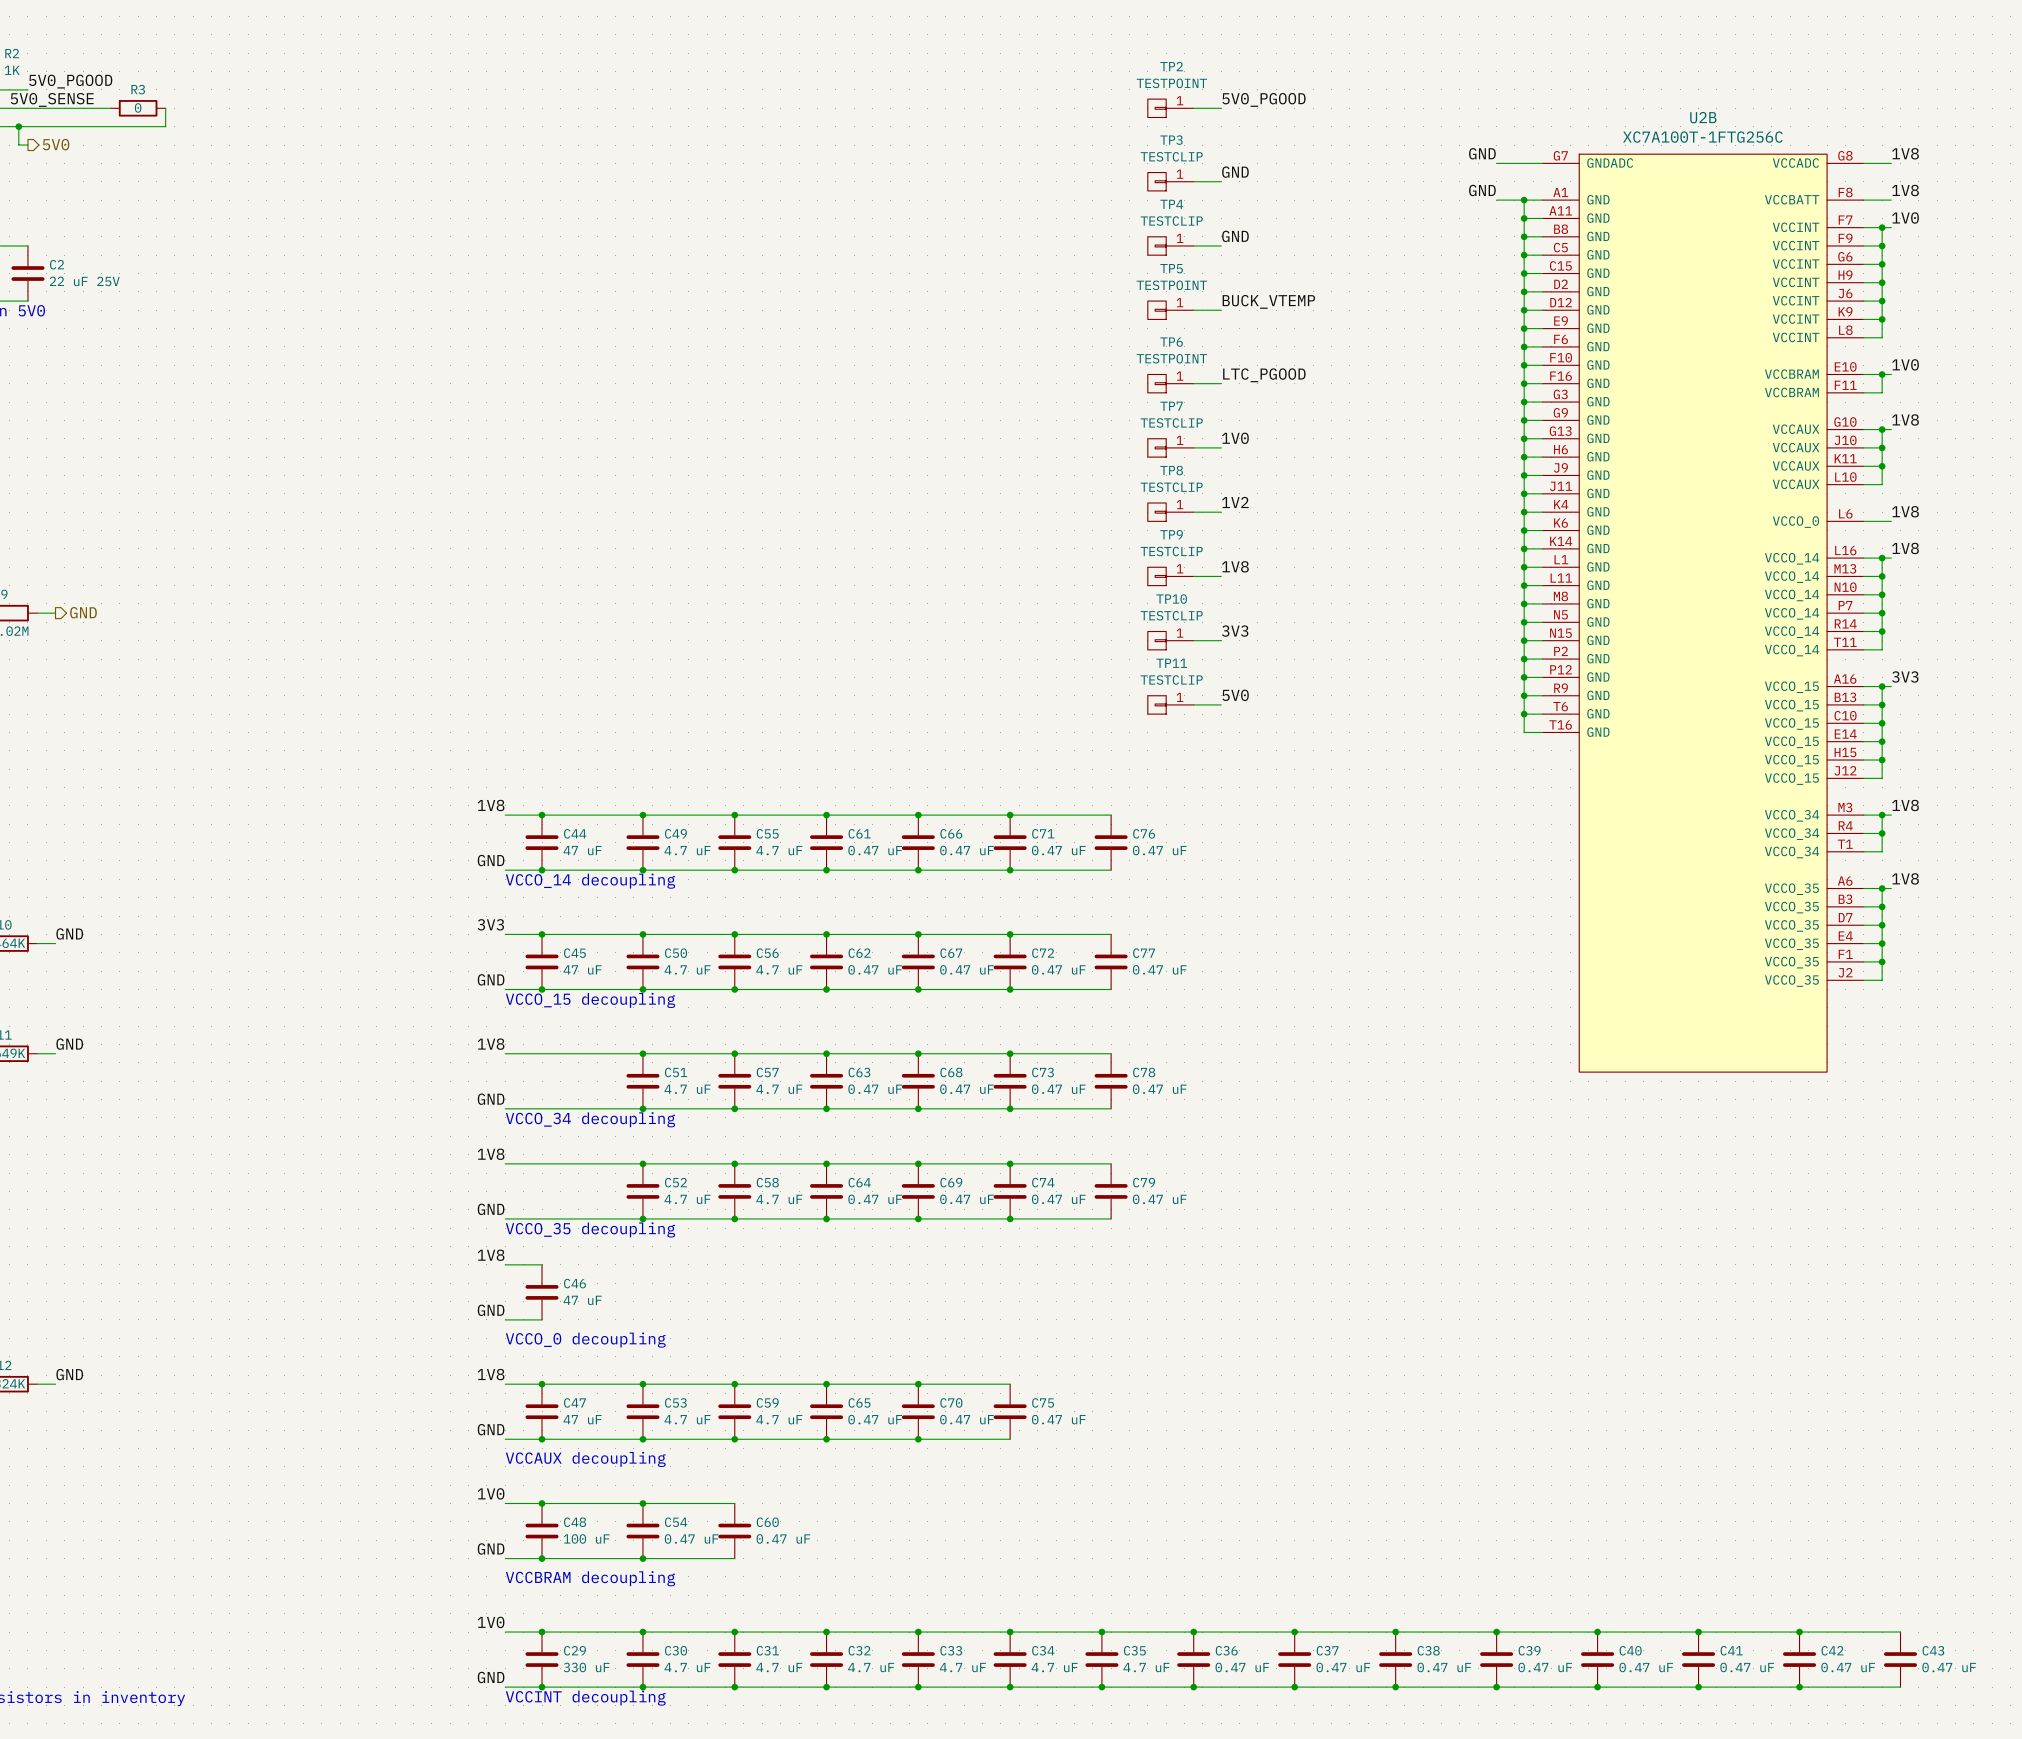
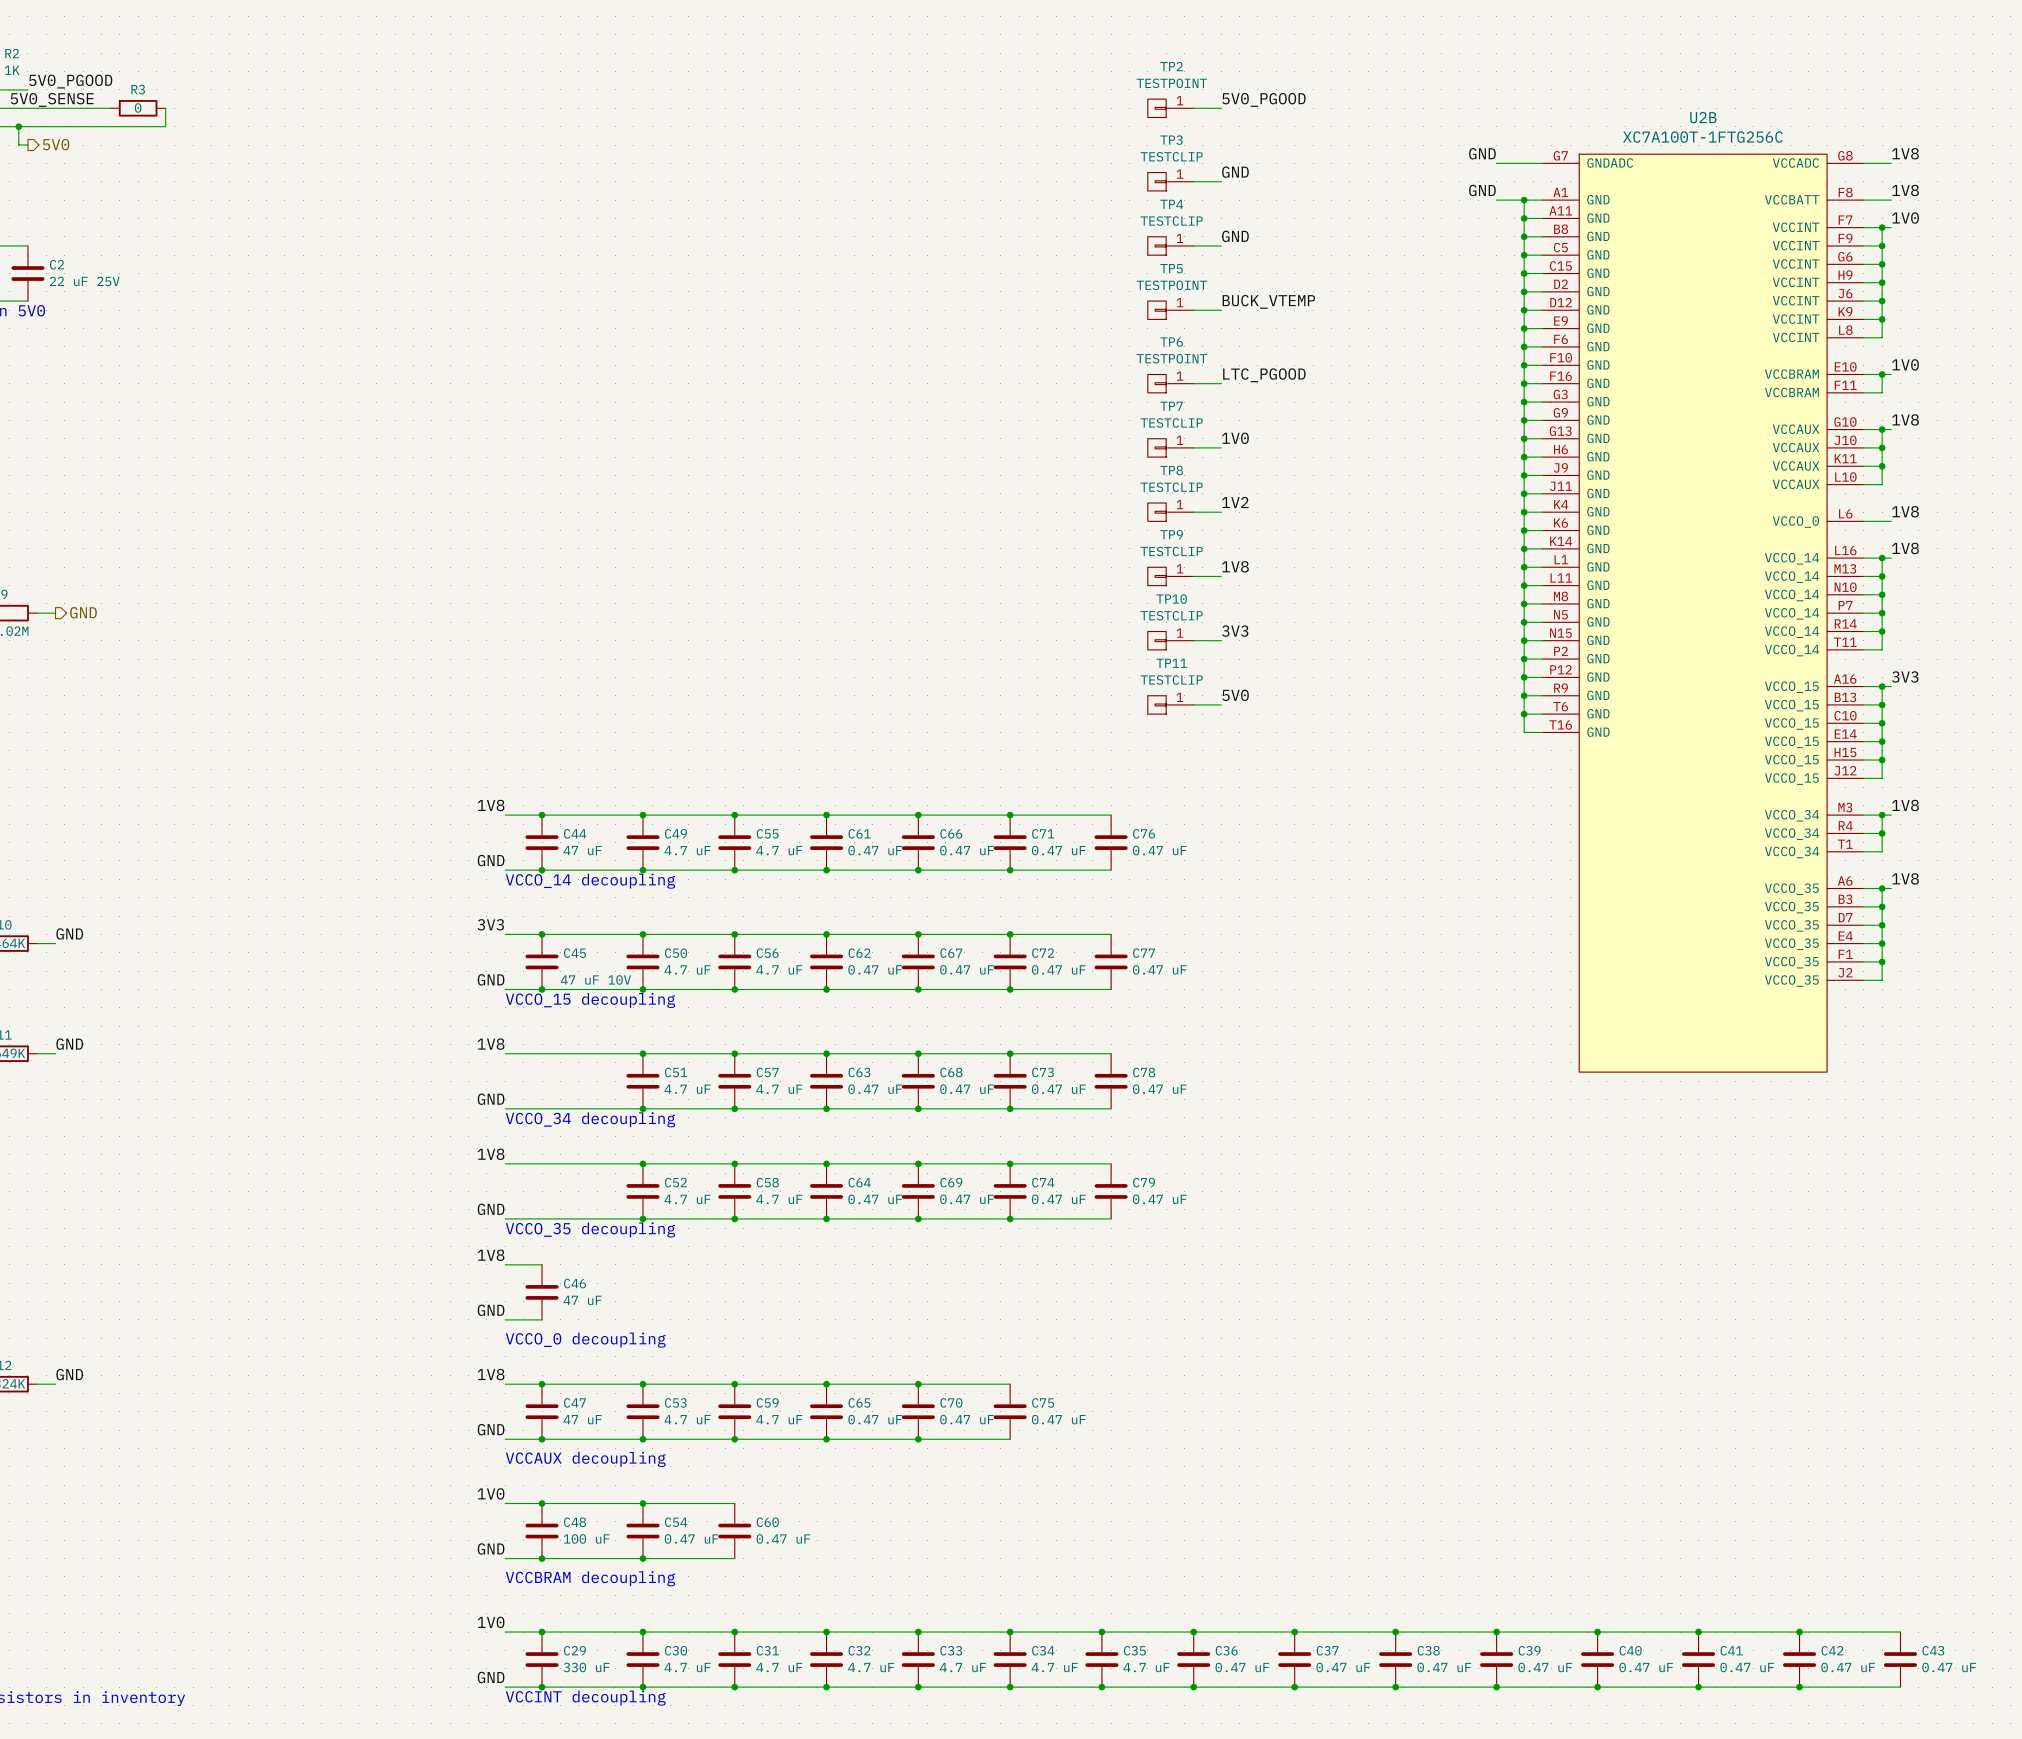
C45 value: 47 uF (582, 969) -> 47 uF 10V (595, 979)

